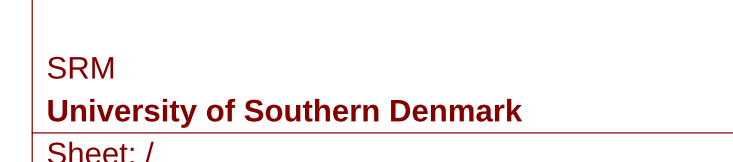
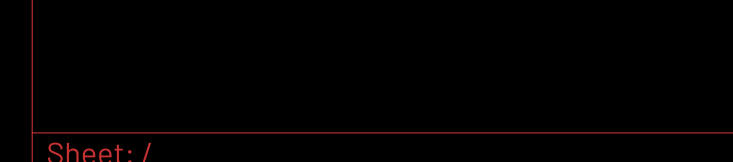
title block: SRM (80, 67) -> none
title block: University of Southern Denmark (285, 113) -> none

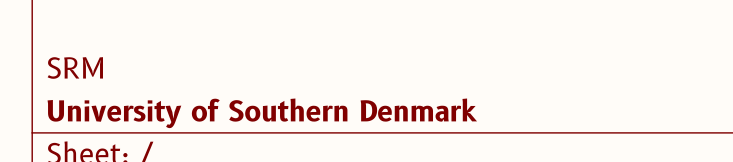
title block: none -> SRM (75, 67)
title block: none -> University of Southern Denmark (262, 113)

